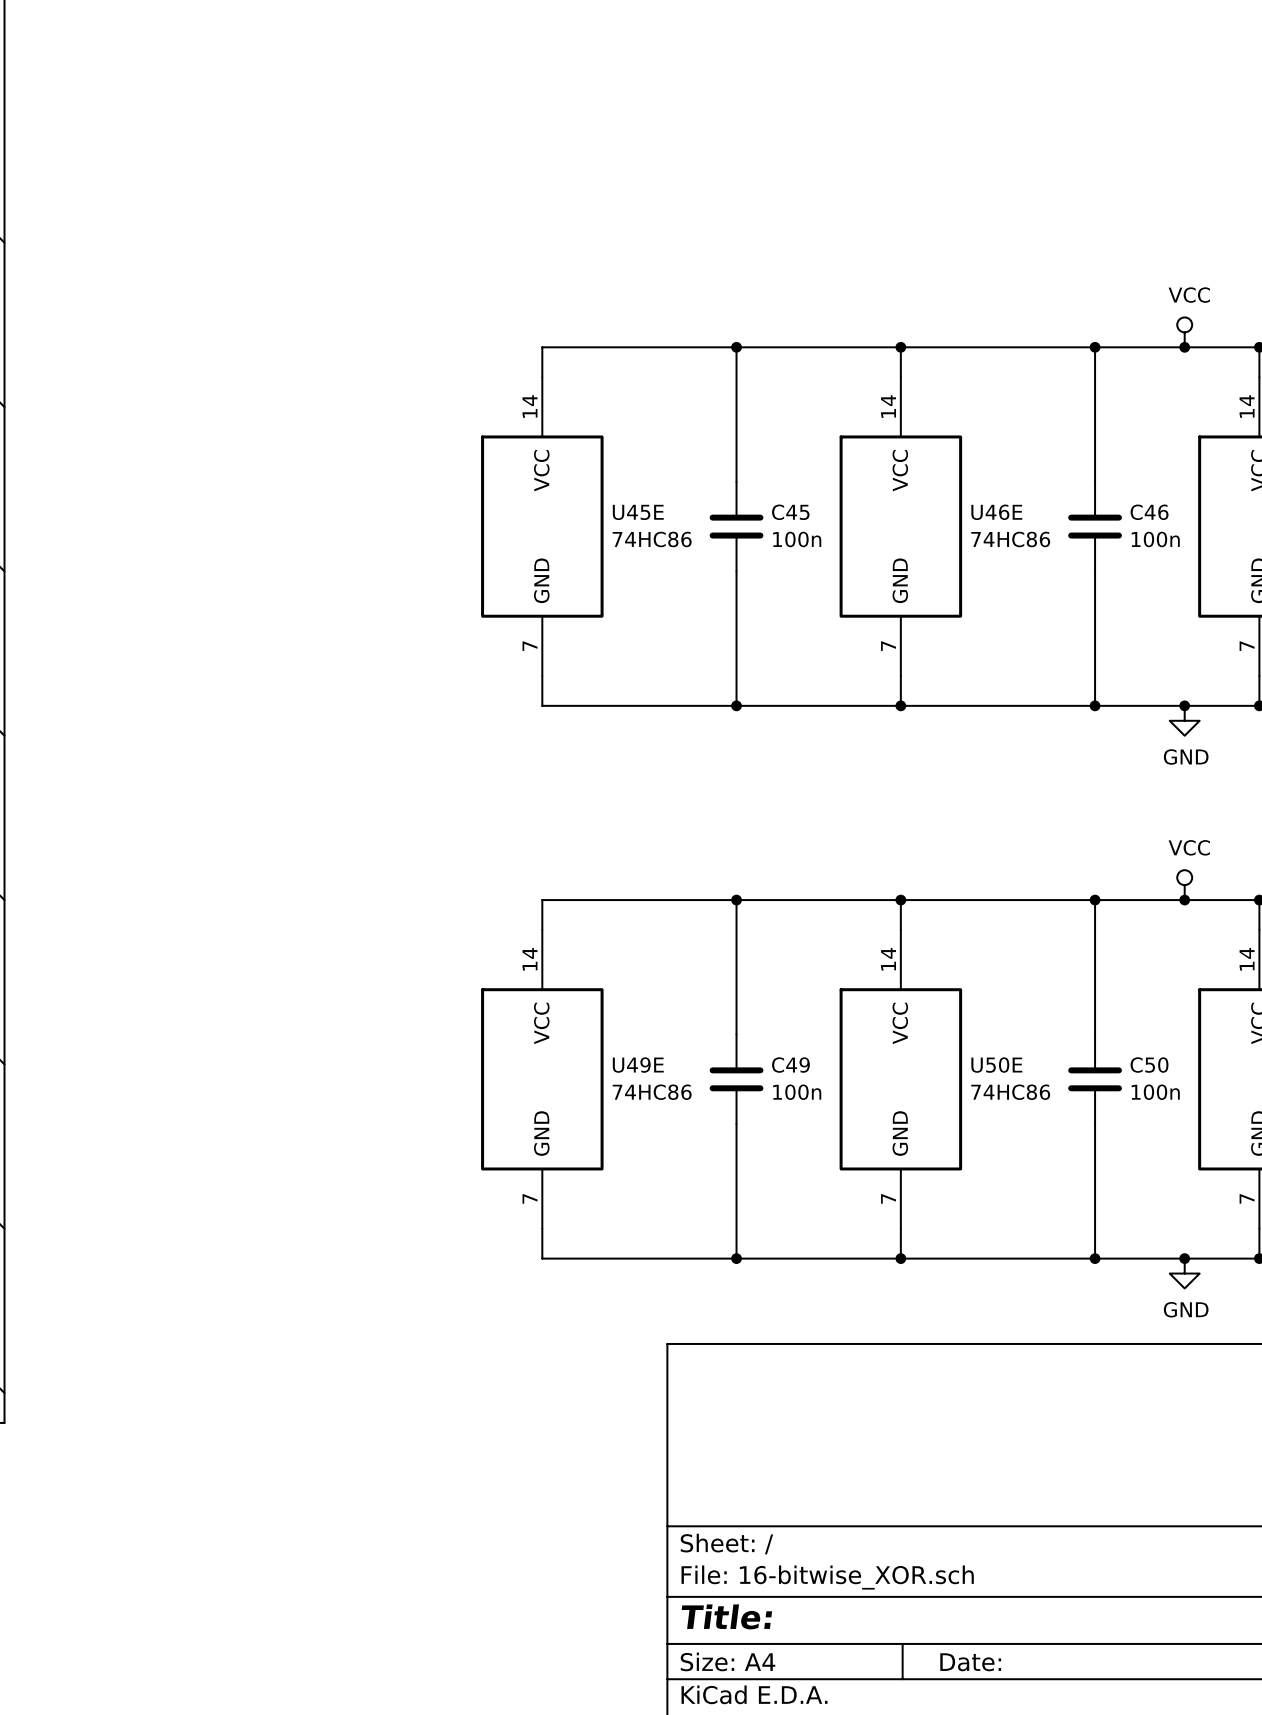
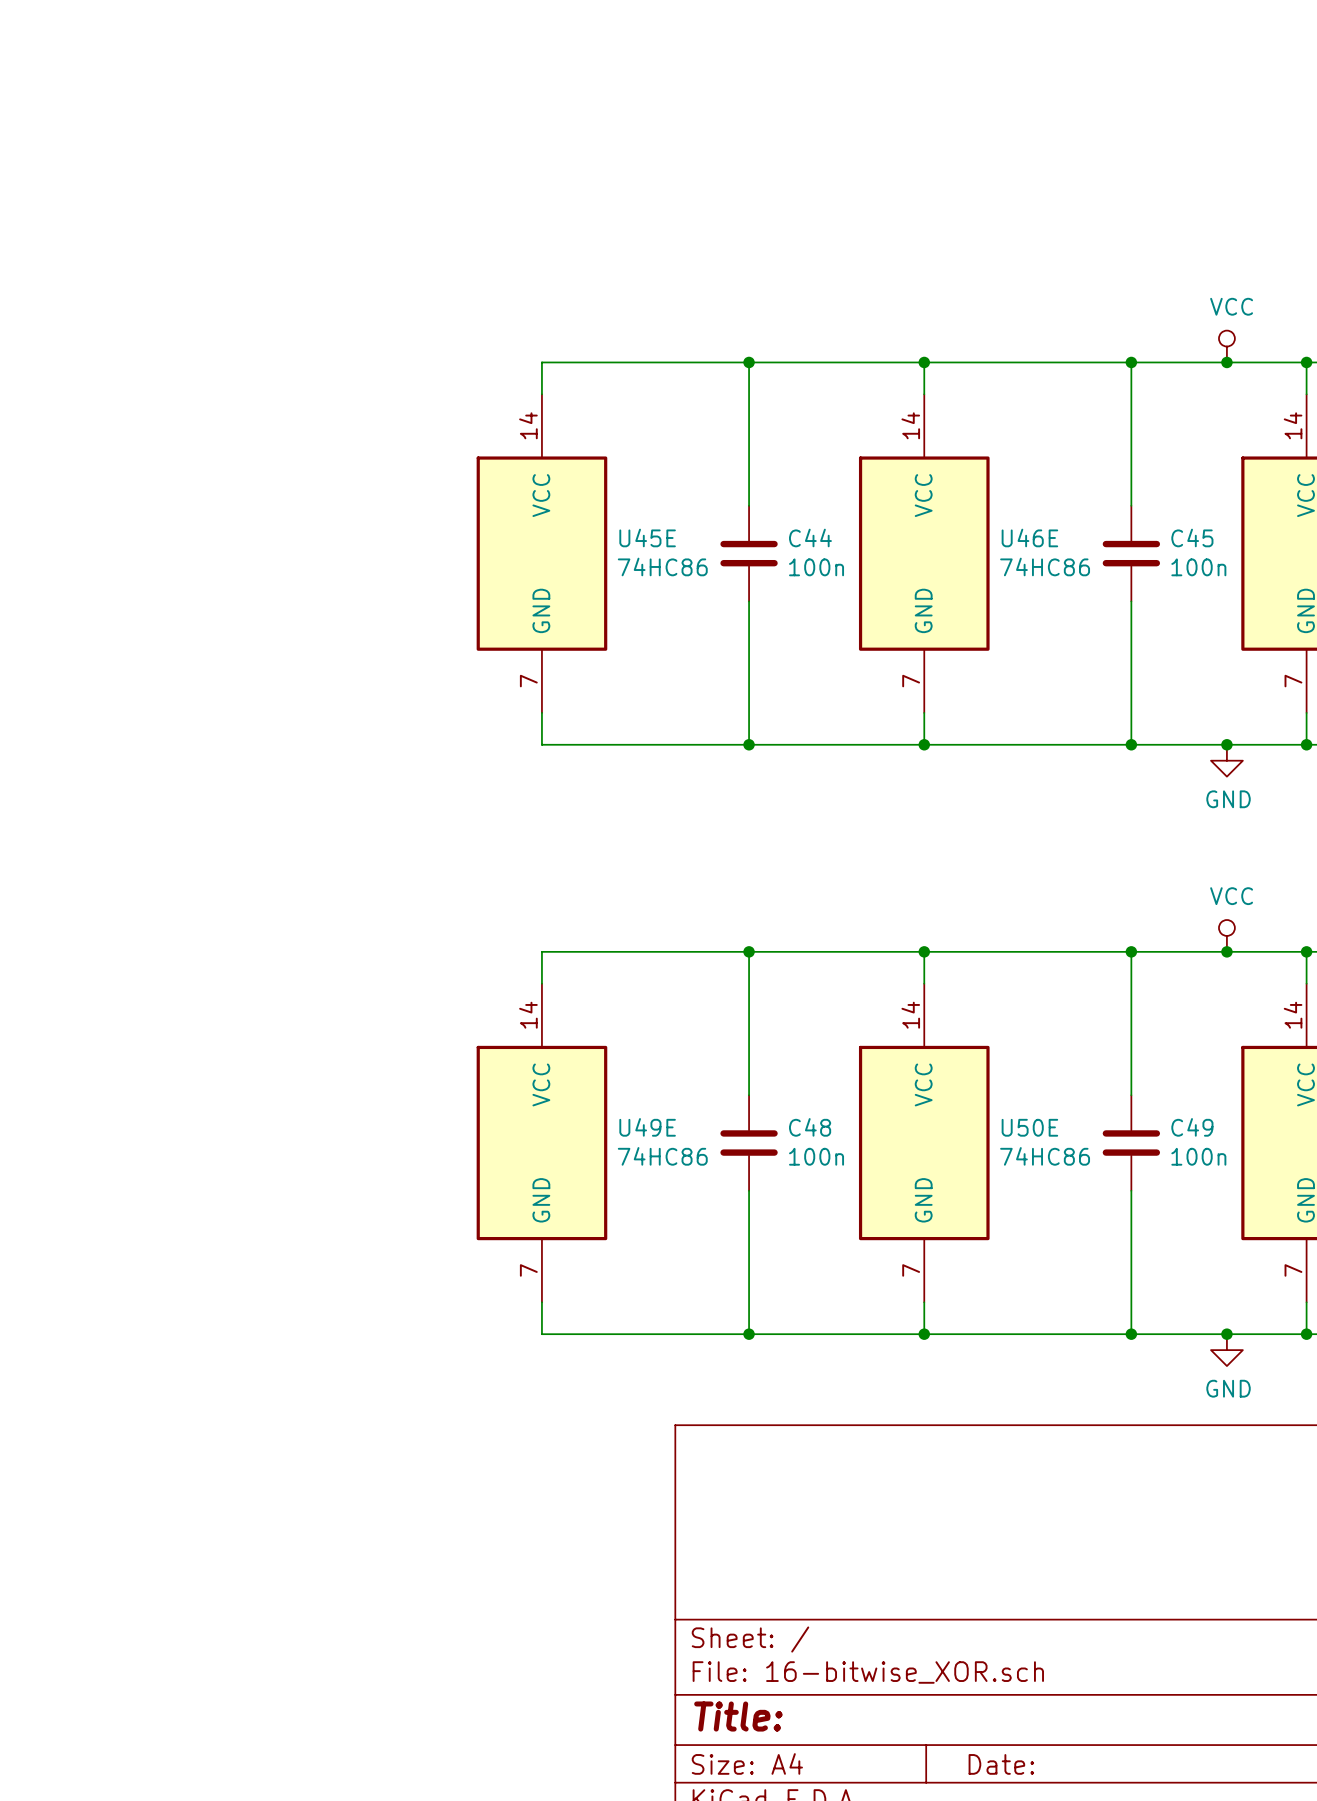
C45 name: C45 (790, 512) -> C44 (810, 537)
C46 name: C46 (1149, 512) -> C45 (1192, 537)
C49 name: C49 (790, 1065) -> C48 (810, 1127)
C50 name: C50 (1149, 1065) -> C49 (1192, 1127)

